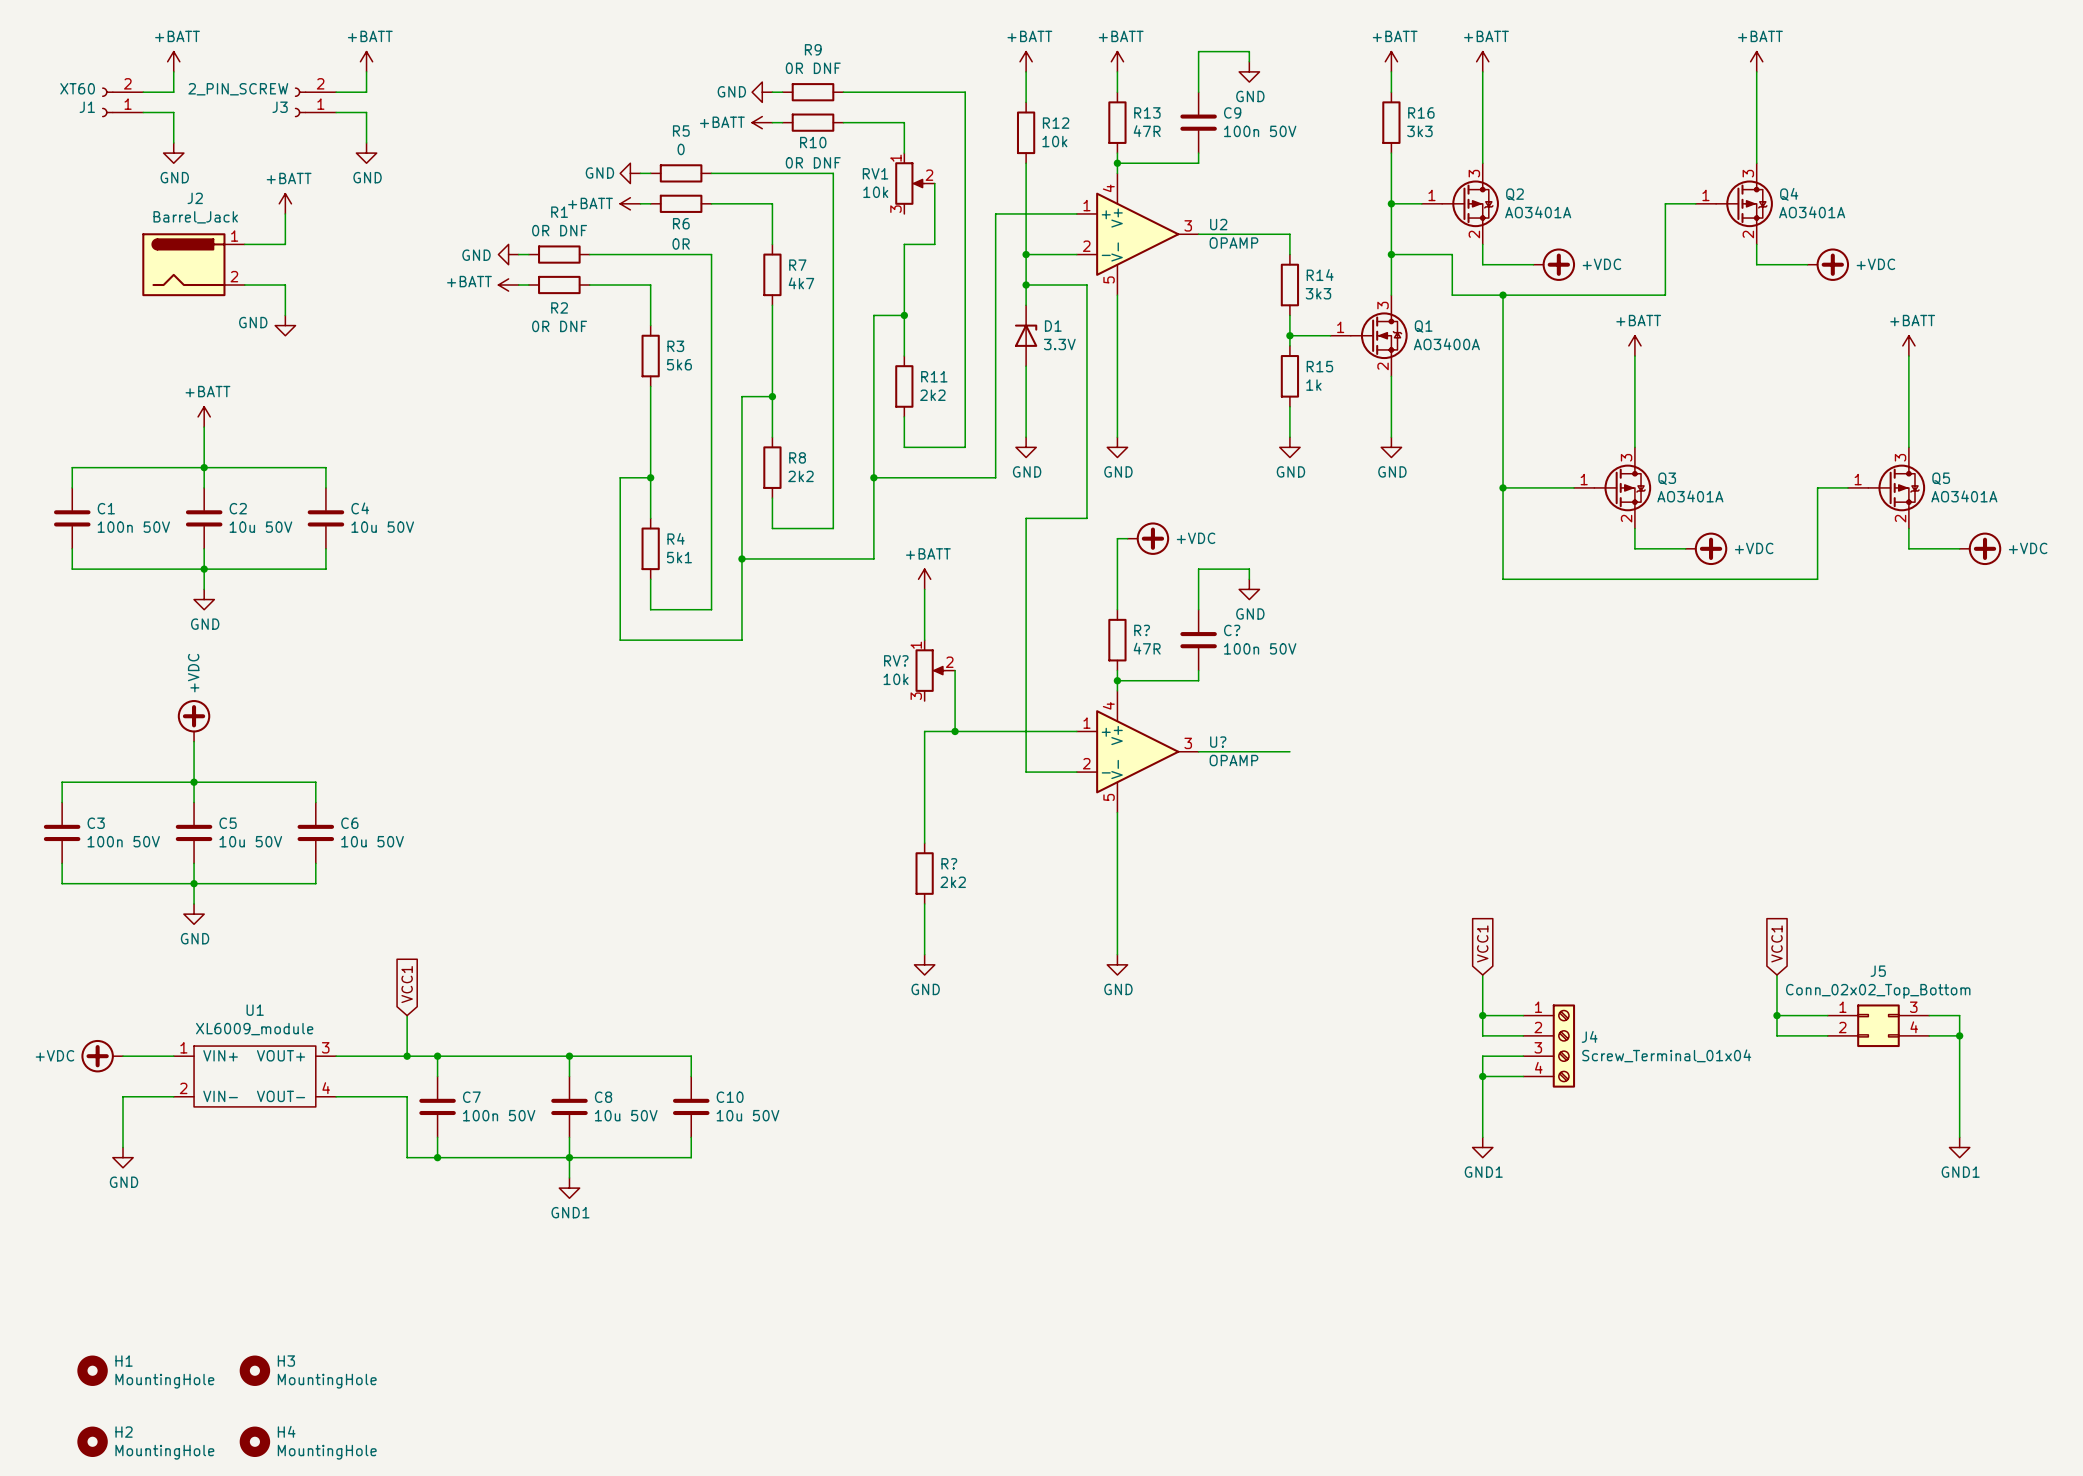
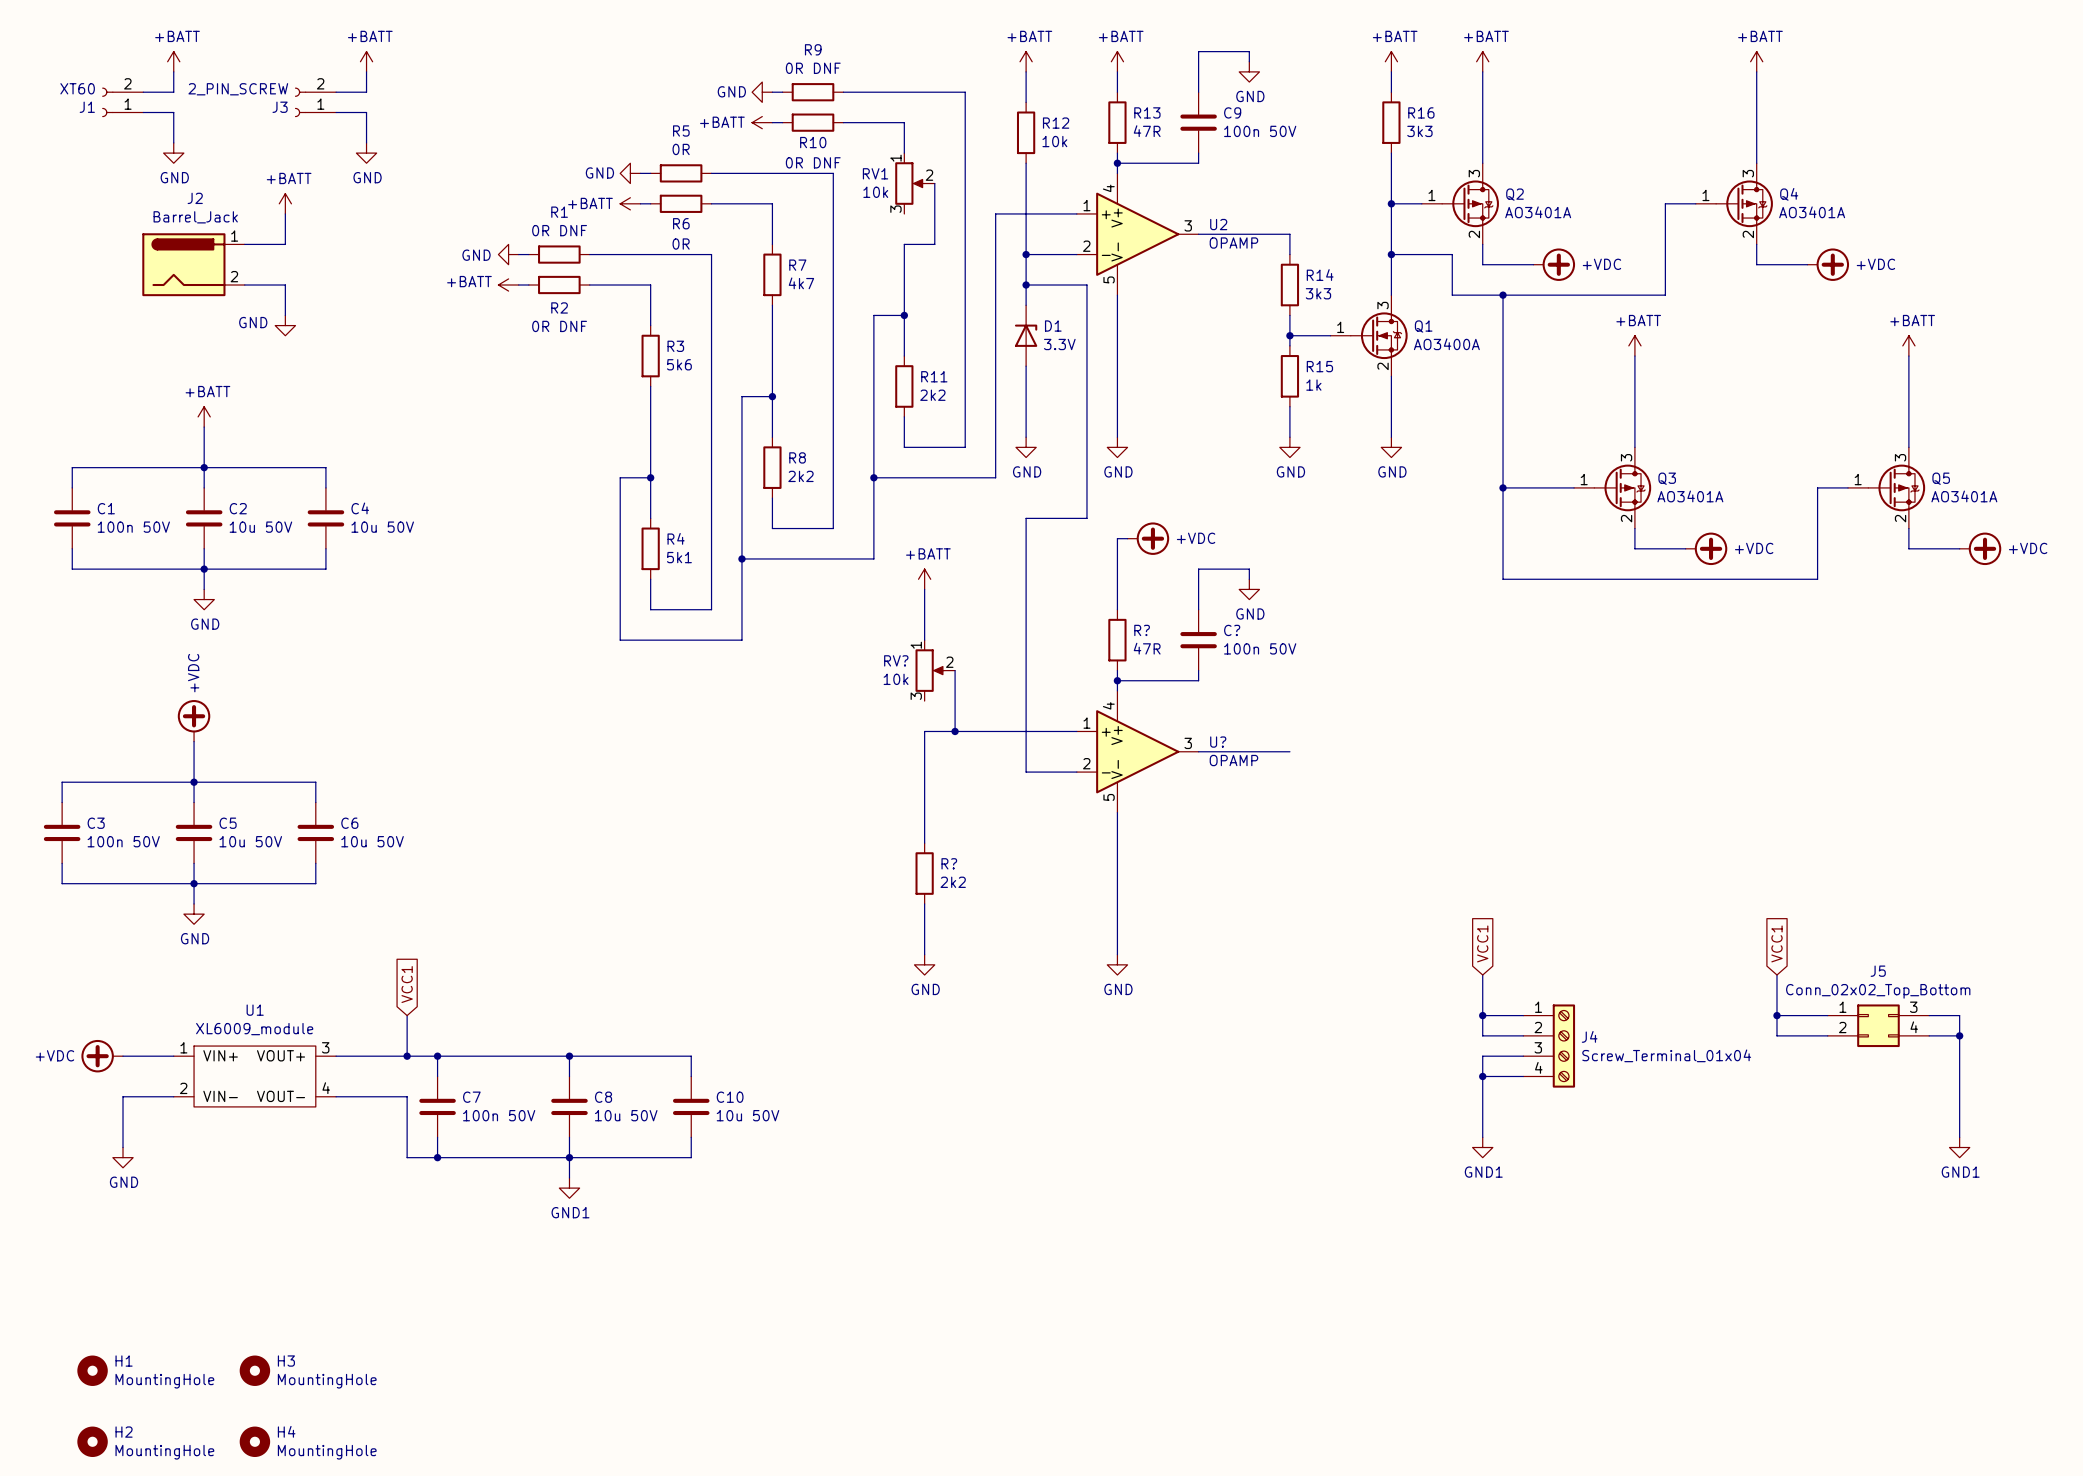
R5 value: 0 (681, 149) -> 0R (681, 149)

